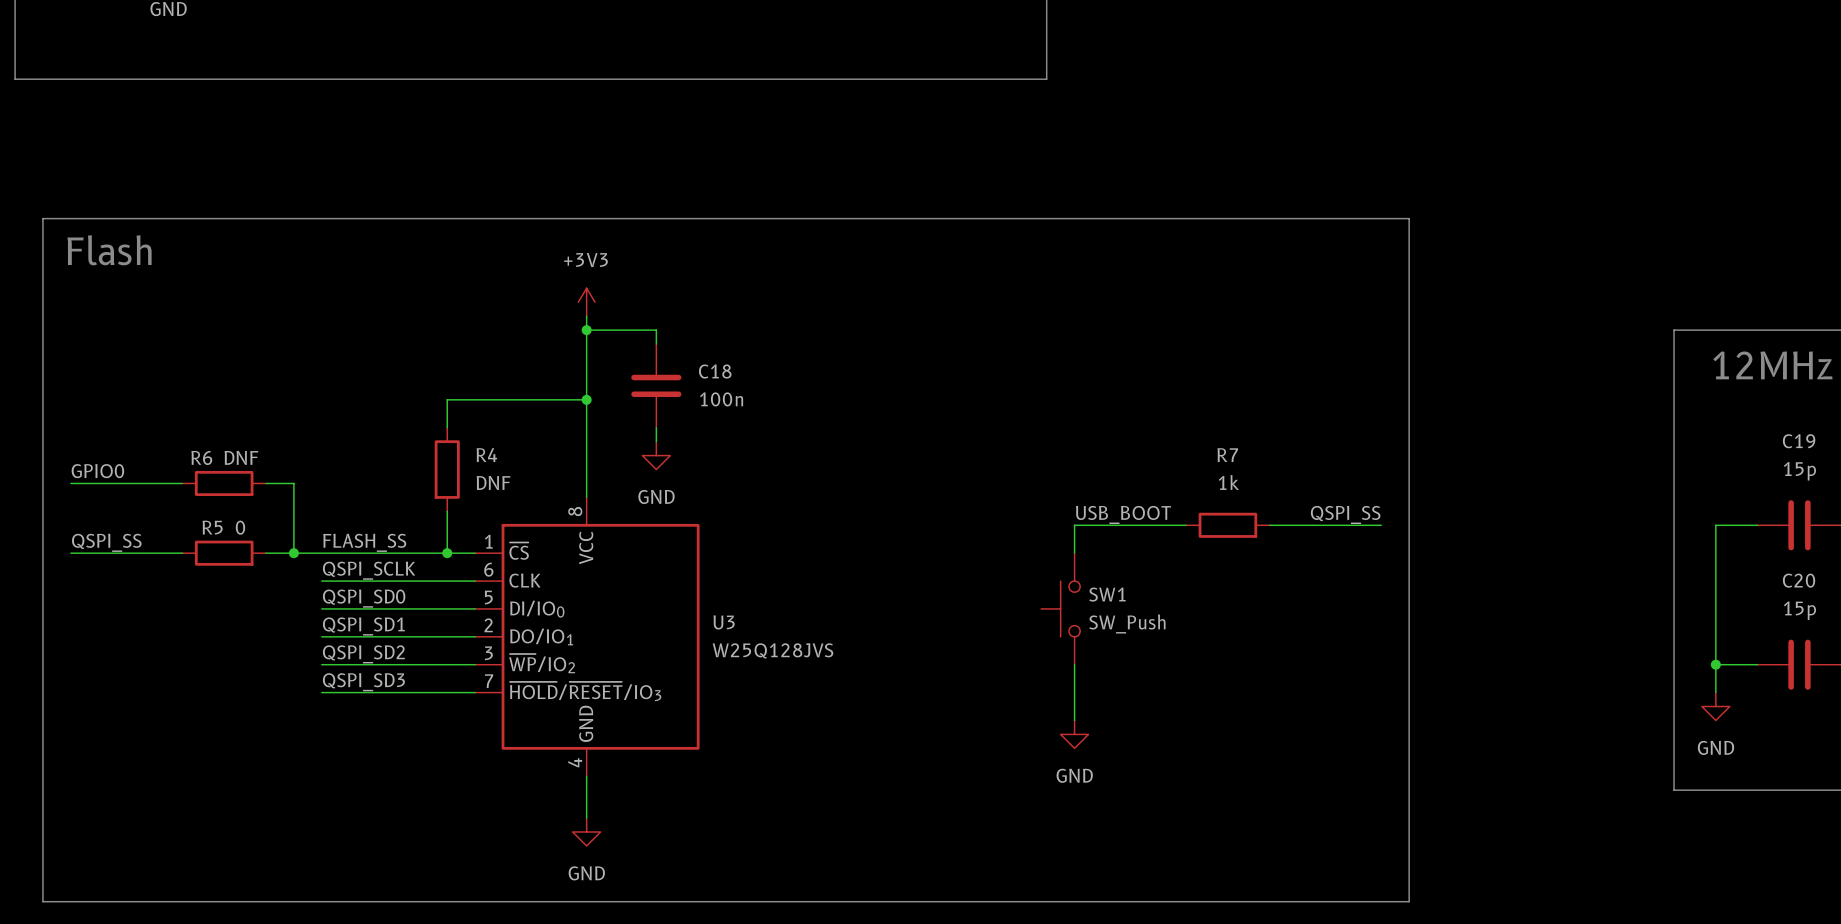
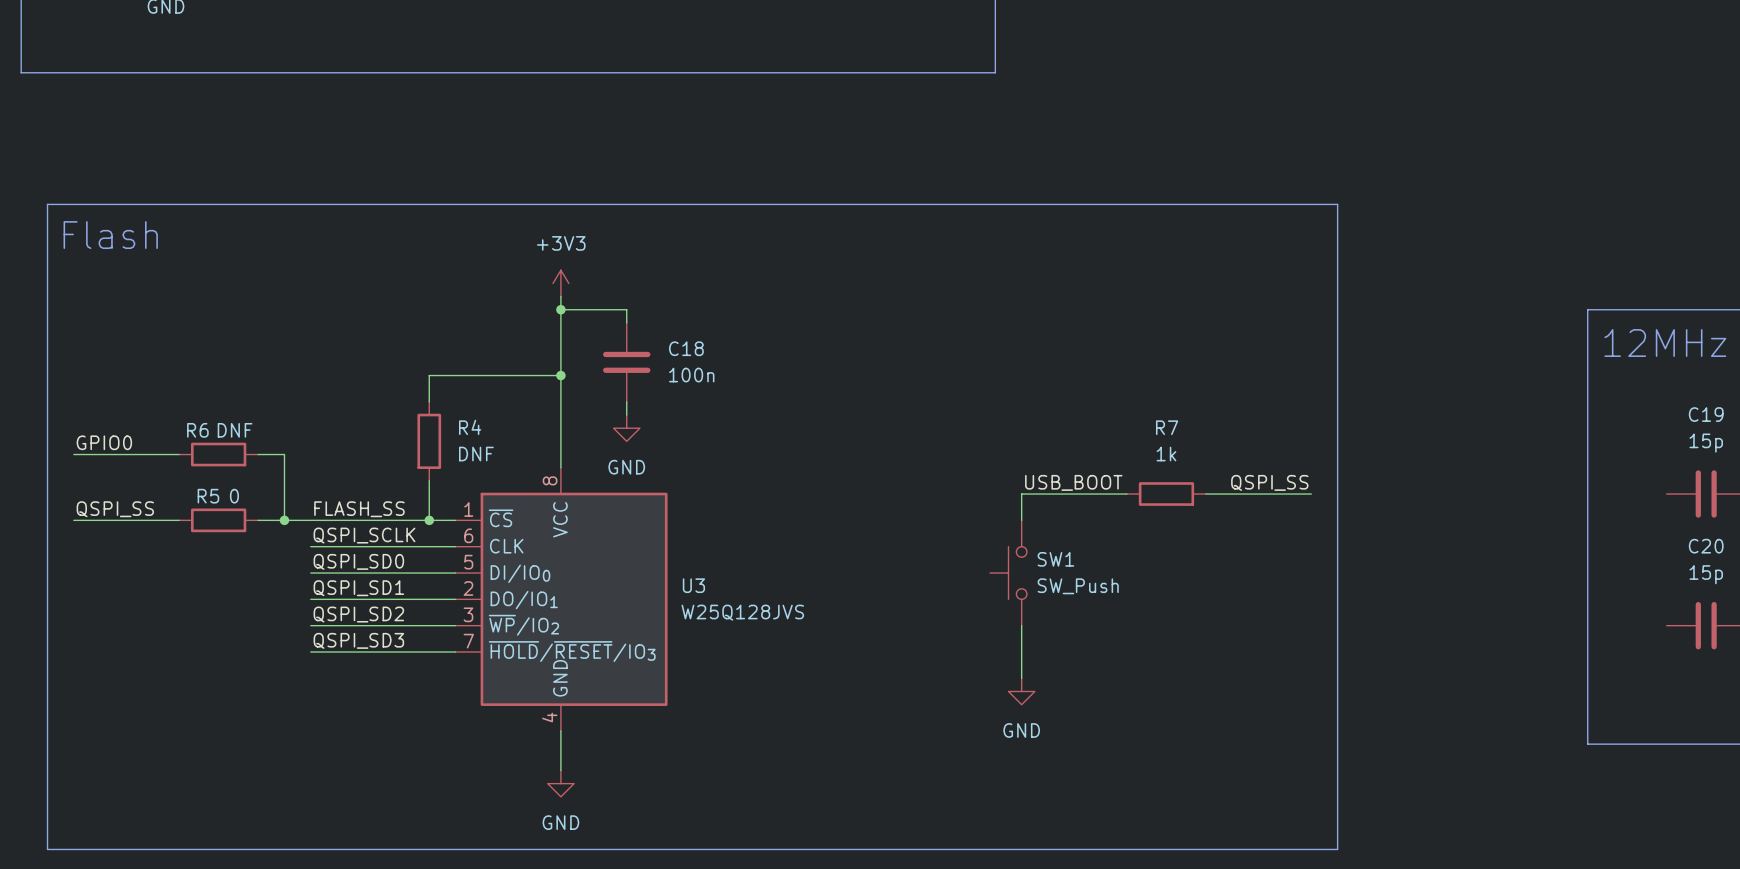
wire: (1757, 525) (1715, 525) (1715, 692) -> none
wire: (1715, 664) (1757, 664) -> none
junction: (1715, 664) -> none
power symbol: GND (1715, 706) -> none

